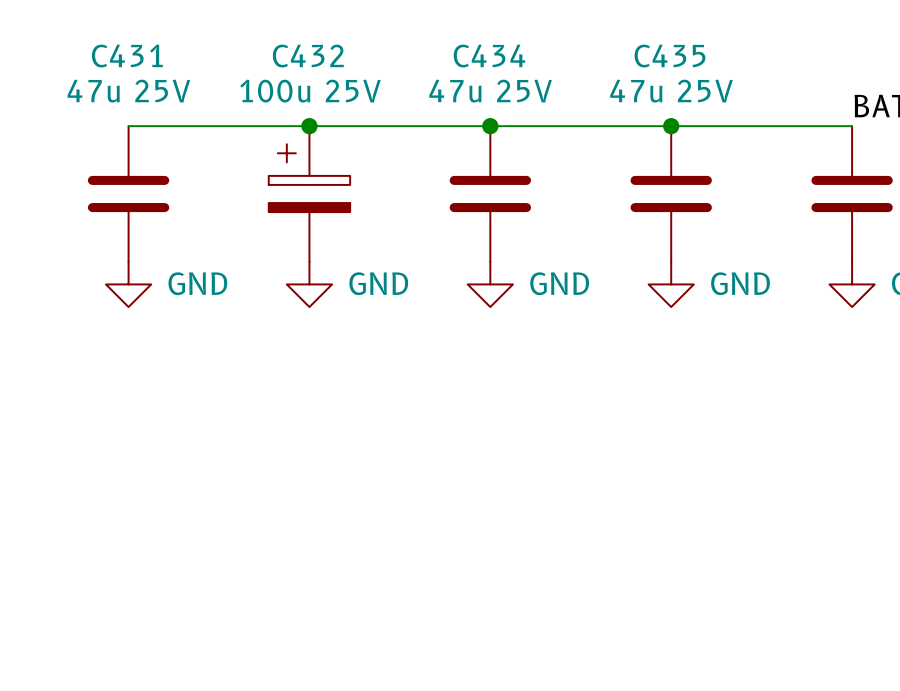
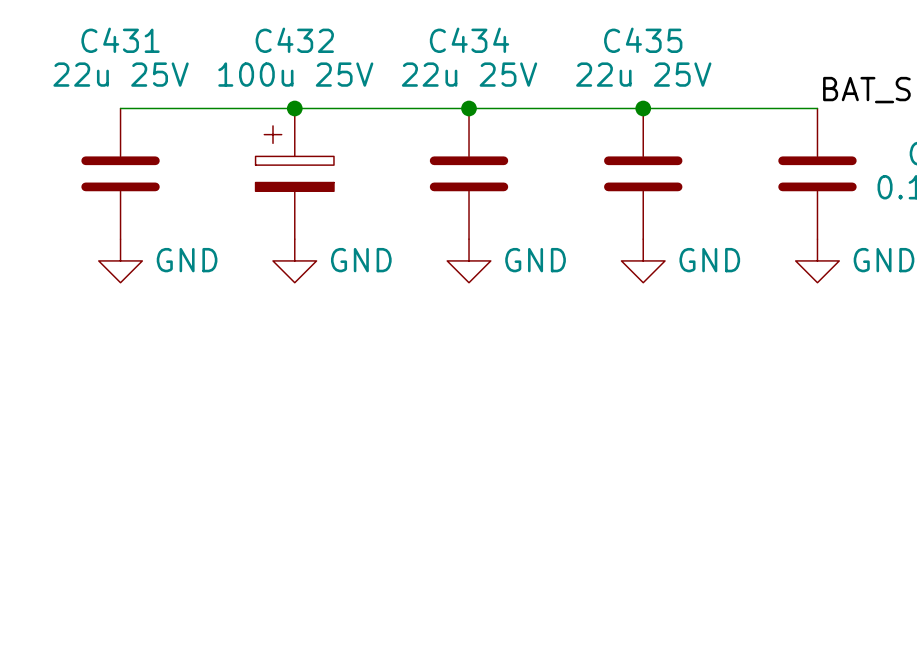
C431 value: 47u 25V (128, 91) -> 22u 25V (121, 74)
C434 value: 47u 25V (490, 91) -> 22u 25V (469, 74)
C435 value: 47u 25V (671, 91) -> 22u 25V (643, 74)

